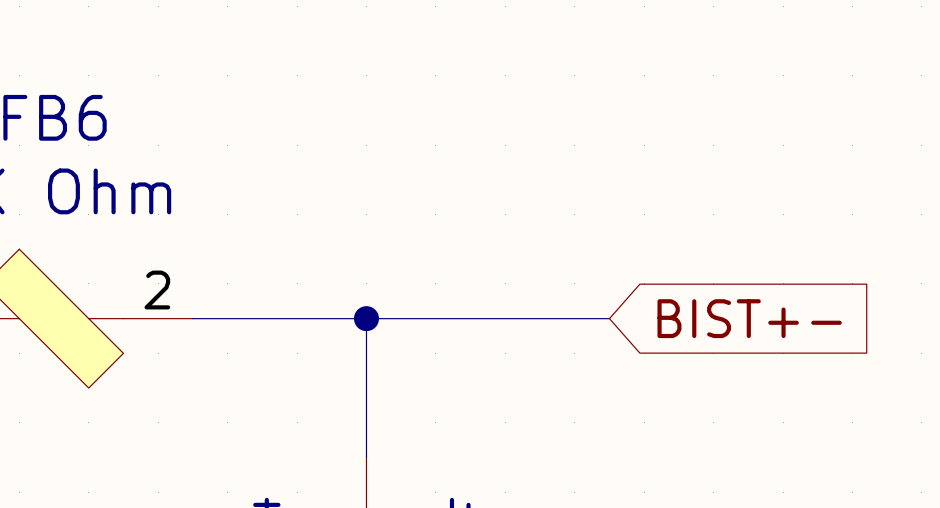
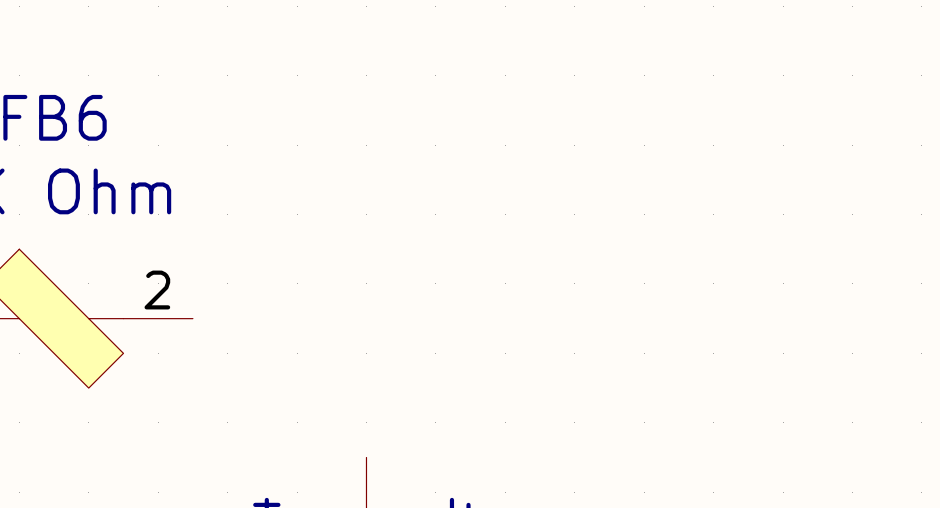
wire: (192, 318) (609, 318) -> none
wire: (366, 318) (366, 457) -> none
junction: (366, 318) -> none
global label: BIST+- (749, 318) -> none

